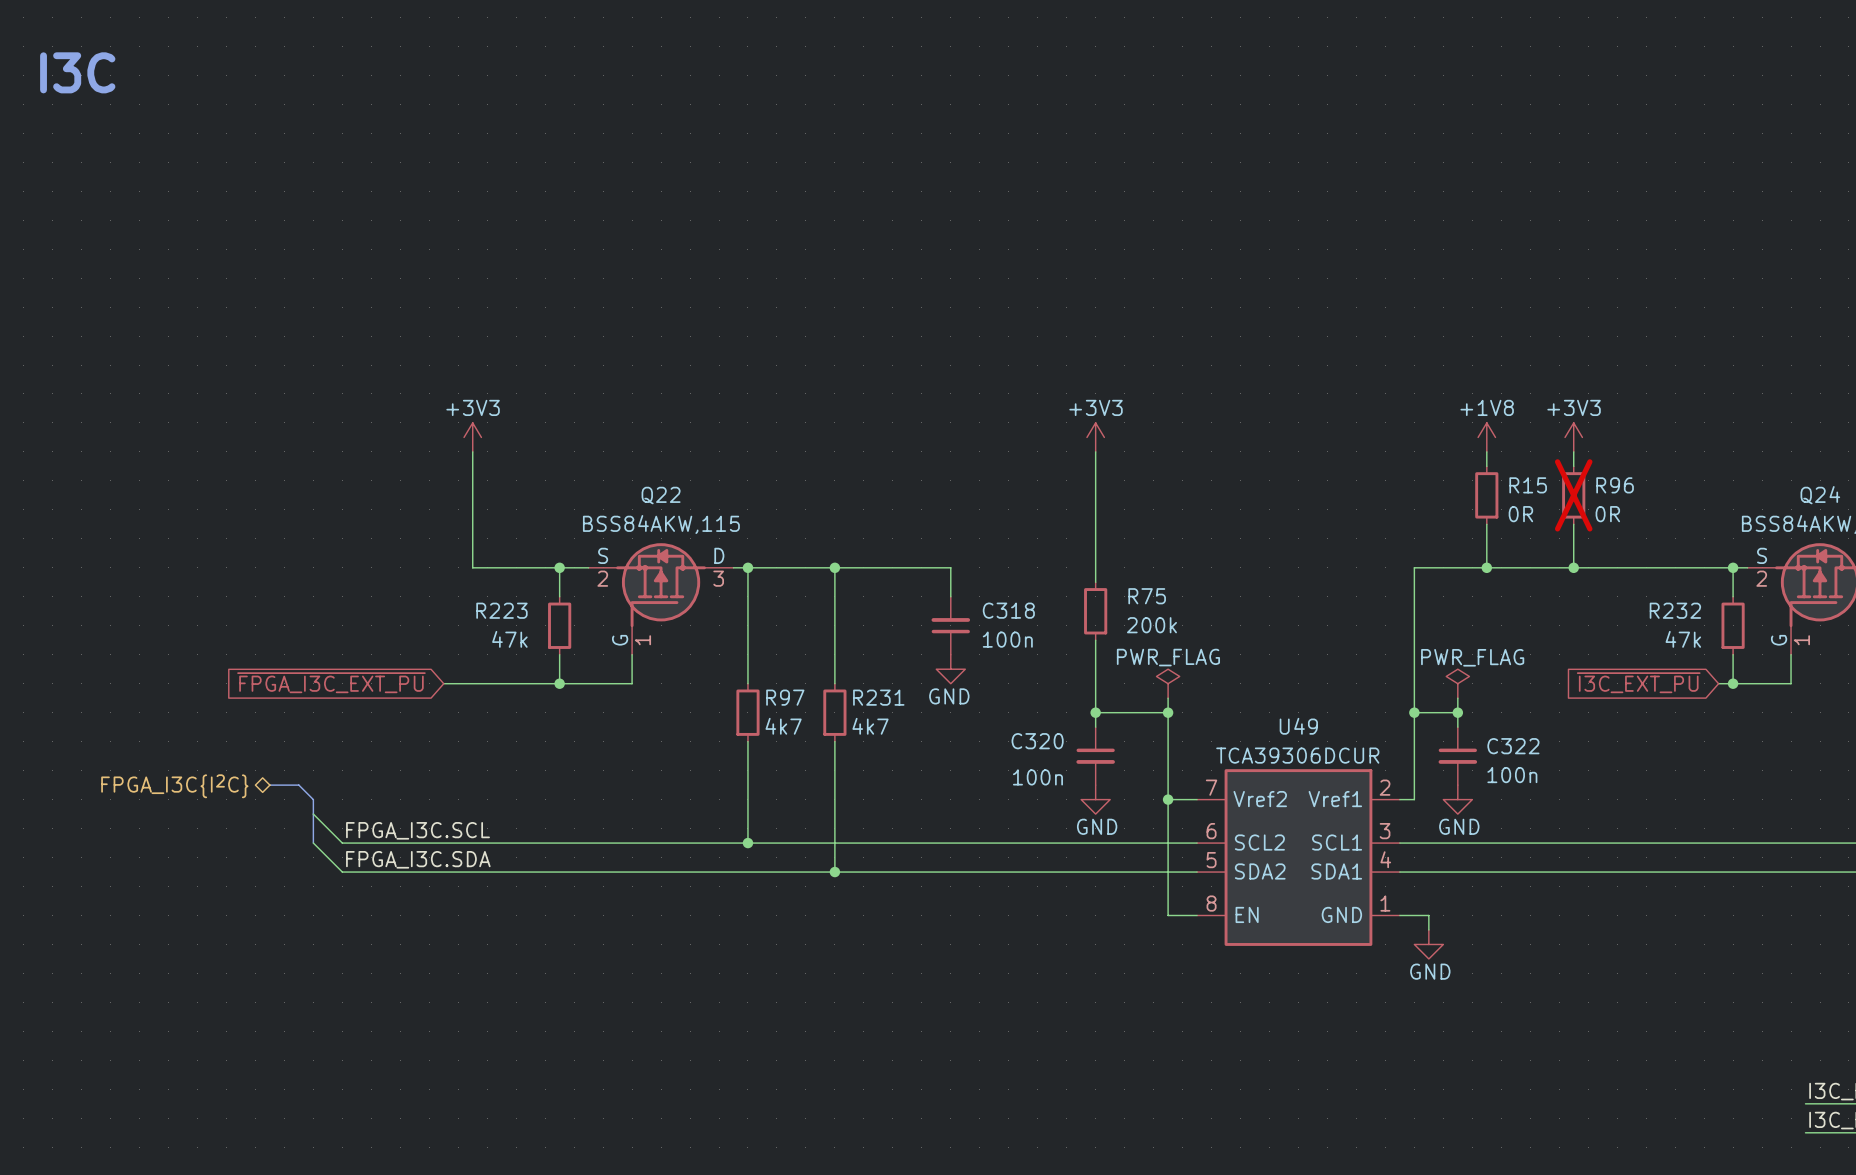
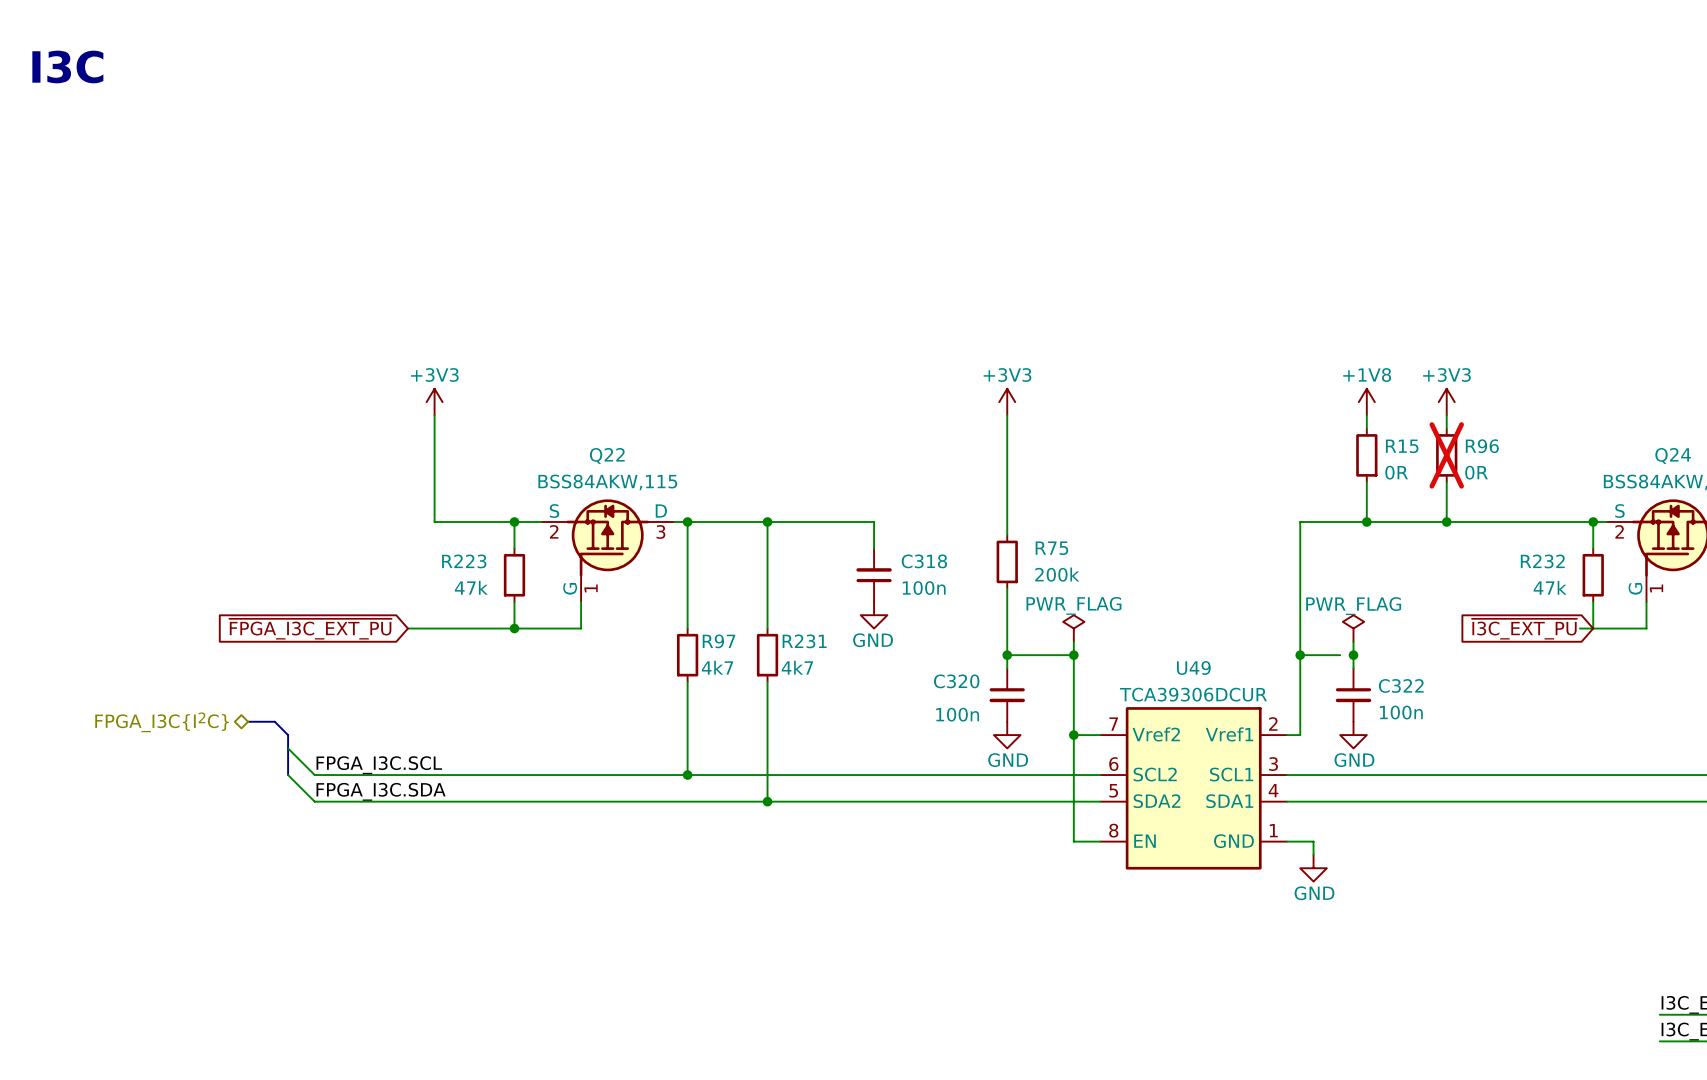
global label position: ~{I3C_EXT_PU} (1638, 682) -> ~{I3C_EXT_PU} (1524, 629)
power symbol position: PWR_FLAG (1457, 683) -> PWR_FLAG (1353, 628)
junction: (1733, 683) -> none
wire: (1457, 698) (1457, 727) -> (1353, 641) (1353, 668)
junction position: (1457, 712) -> (1353, 655)
C322 position: (1457, 756) -> (1353, 695)
power symbol position: GND (1457, 799) -> GND (1353, 735)

